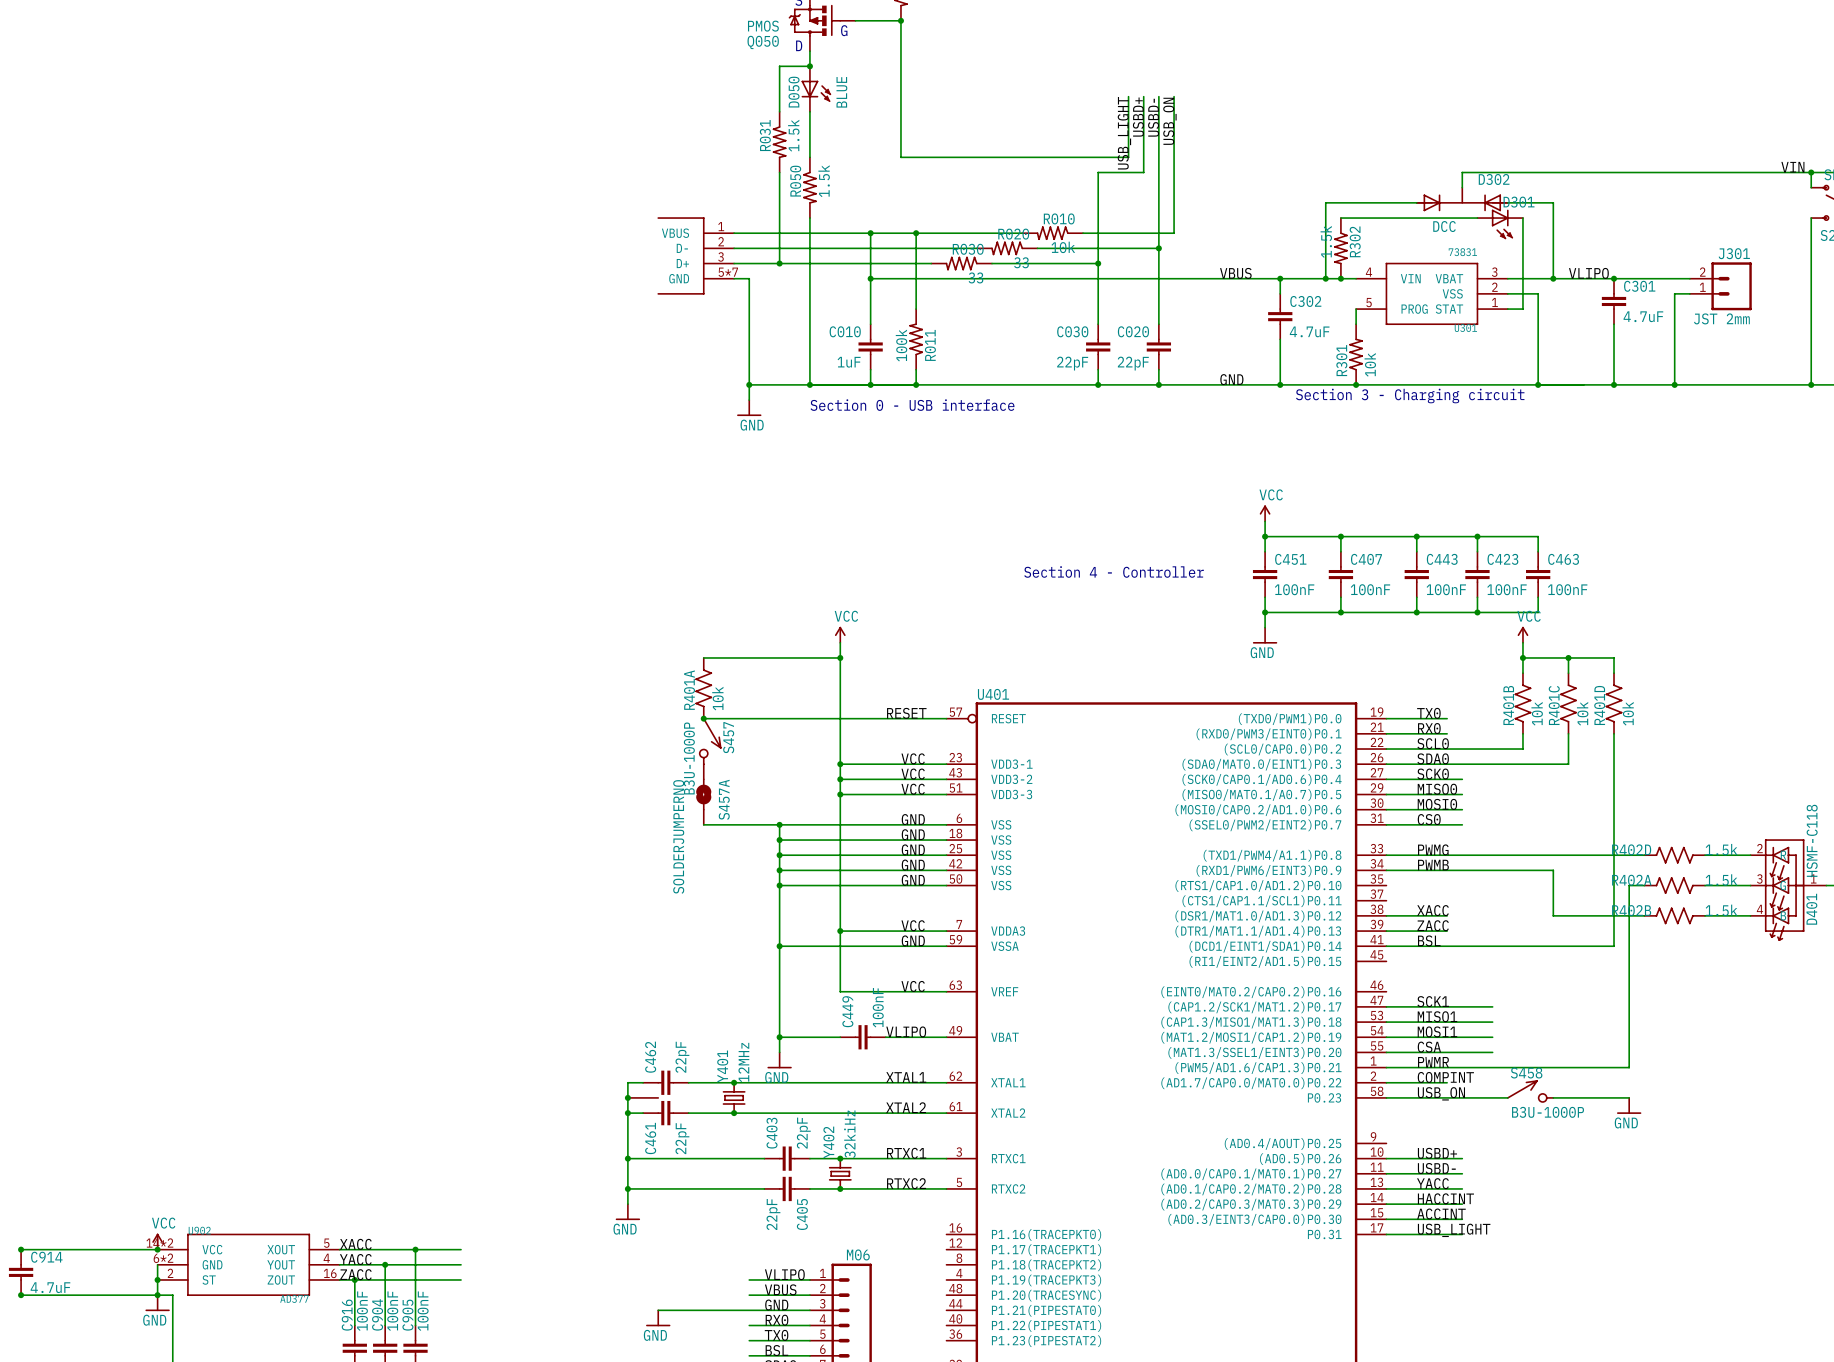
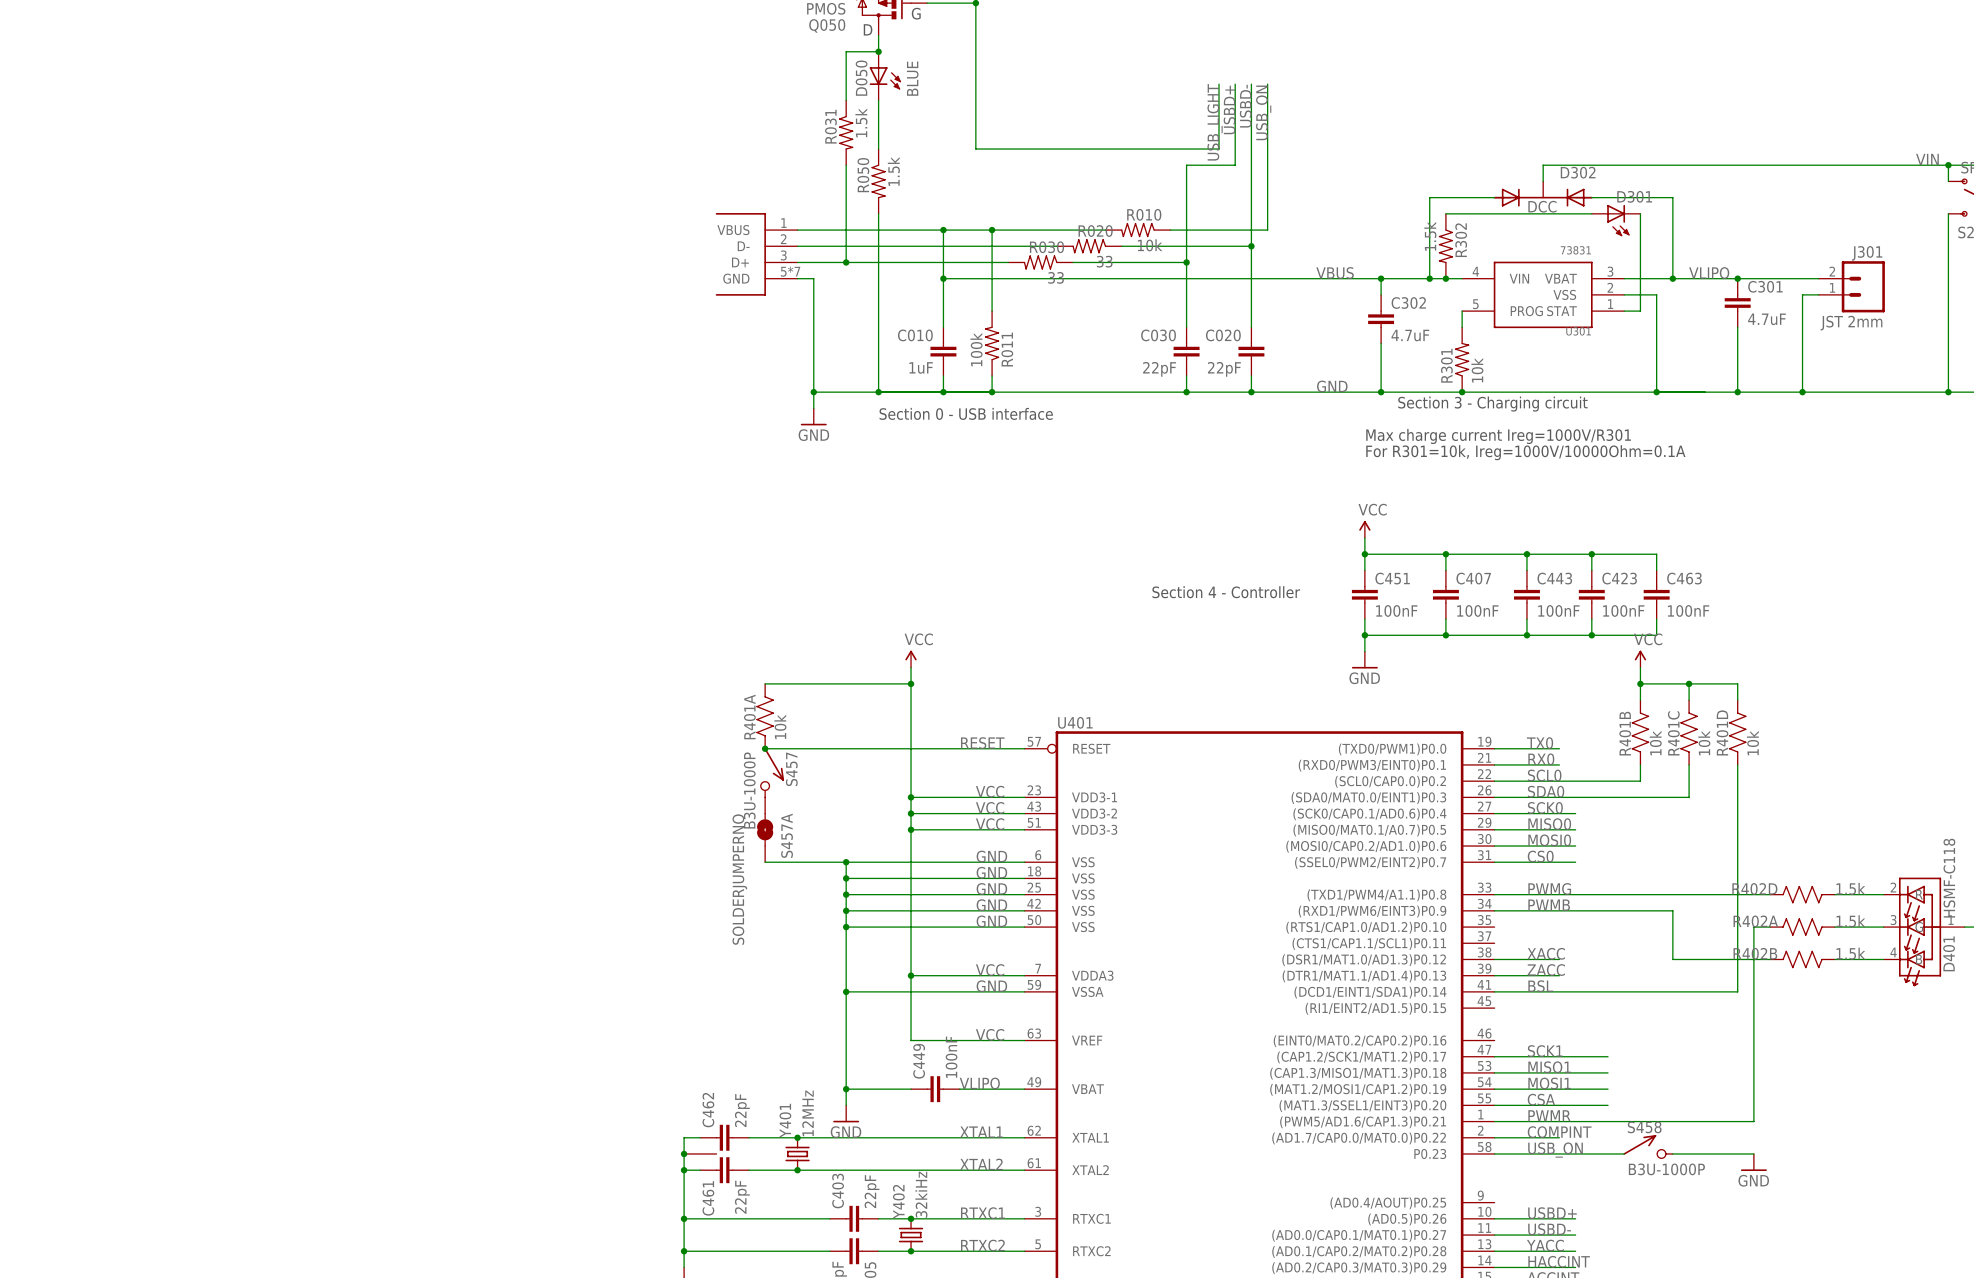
wire: (1462, 172) (1462, 187) -> (1575, 165) (1543, 165) (1543, 181)
D302 position: (1462, 199) -> (1543, 193)
D302 value position: DCC (1444, 226) -> DCC (1542, 206)
text: none -> Max charge current Ireg=1000V/R301 (1498, 436)
text: none -> For R301=10k, Ireg=1000V/10000Ohm=0.1A (1525, 452)

